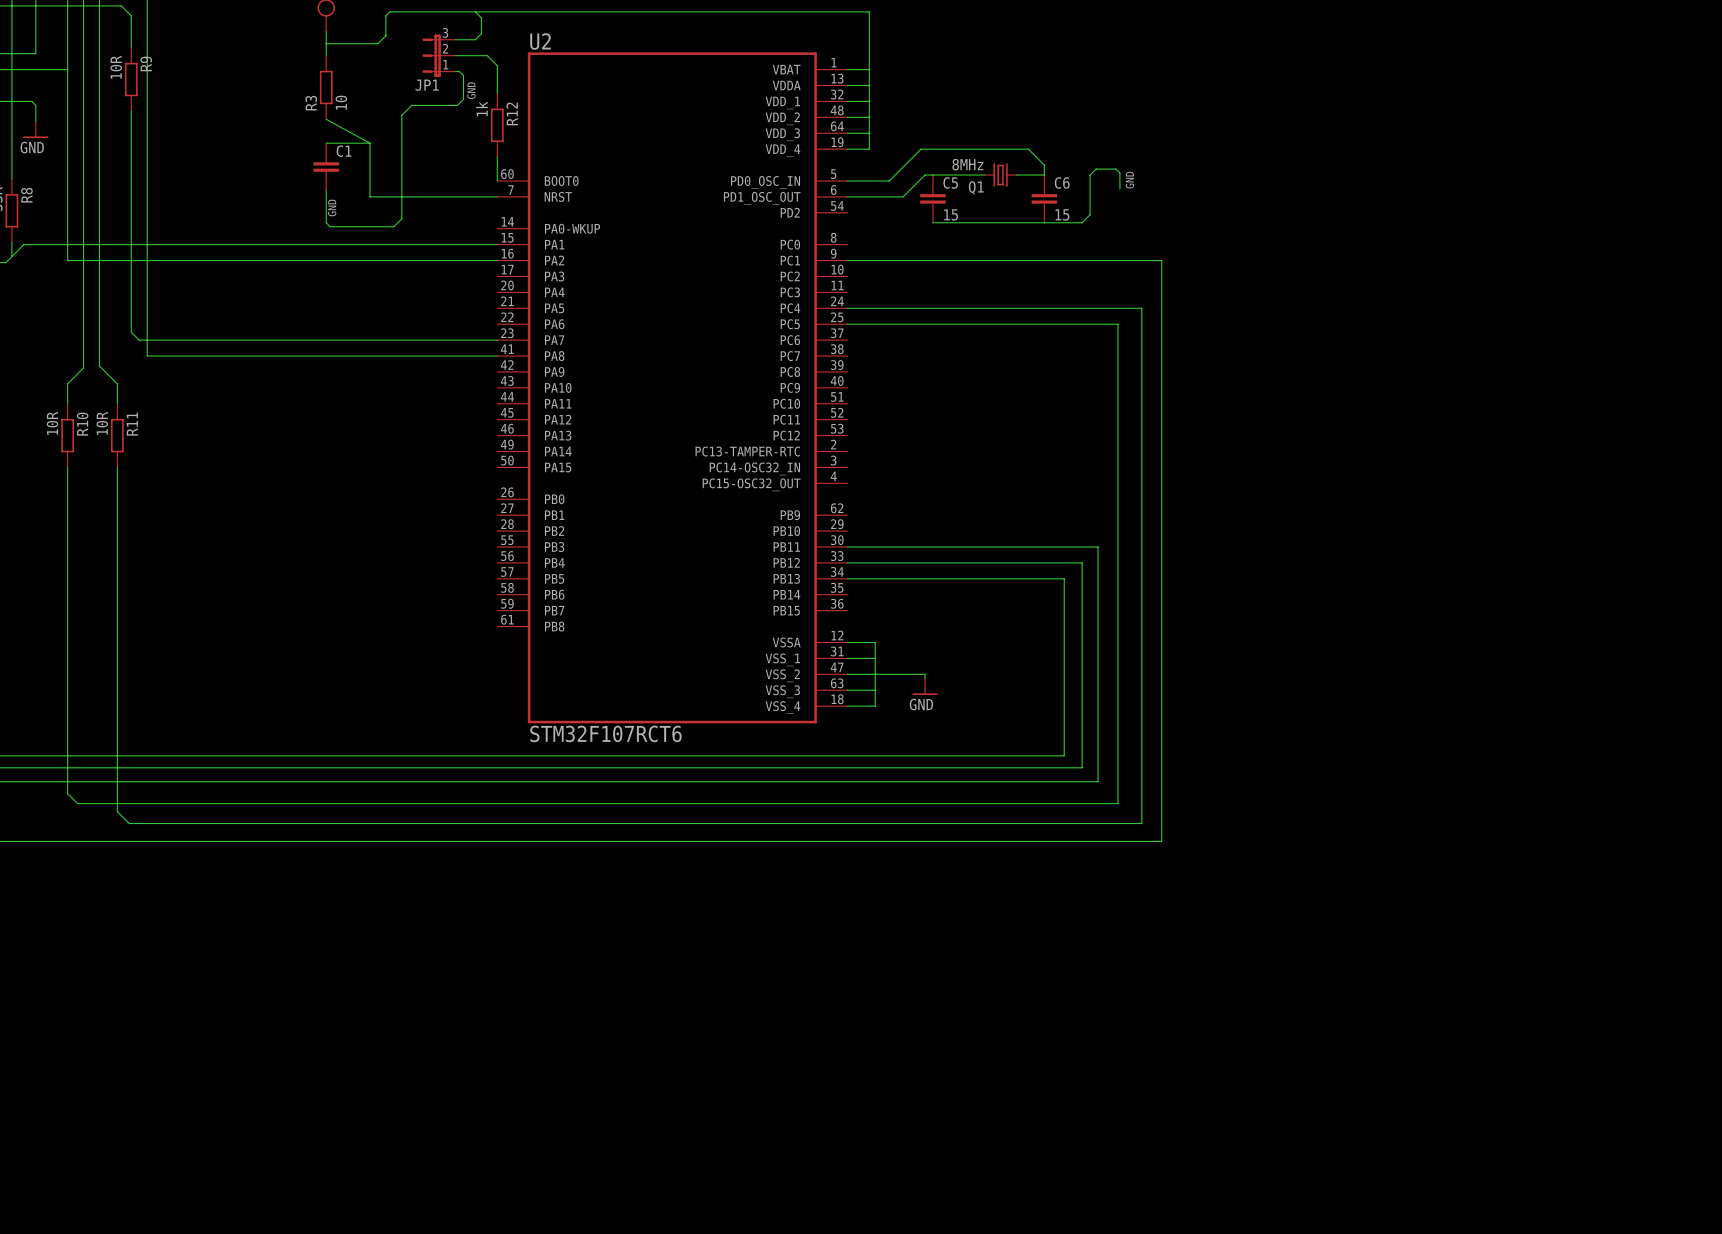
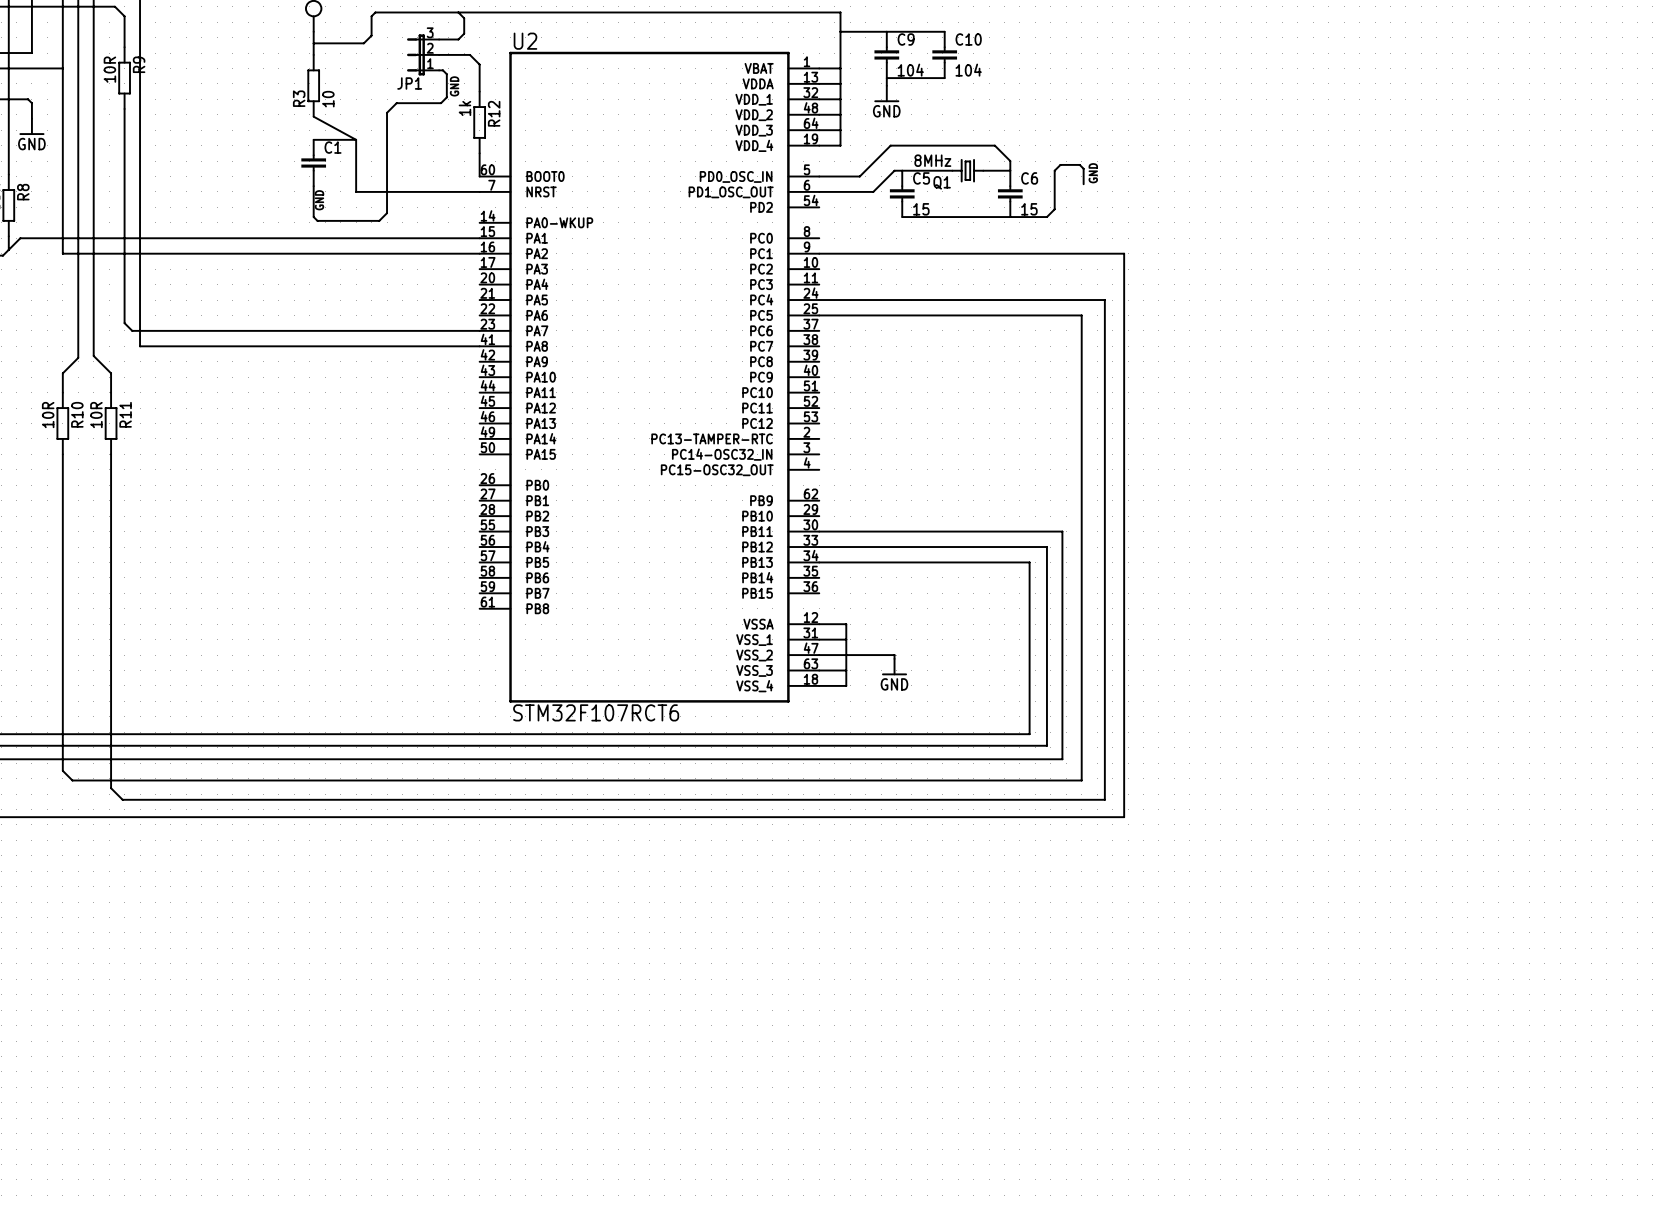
wire: none -> (840, 31) (944, 31)
C9: none -> 104 (886, 54)
C10: none -> 104 (944, 54)
wire: none -> (944, 78) (886, 78) (886, 85)
power symbol: none -> GND (886, 93)

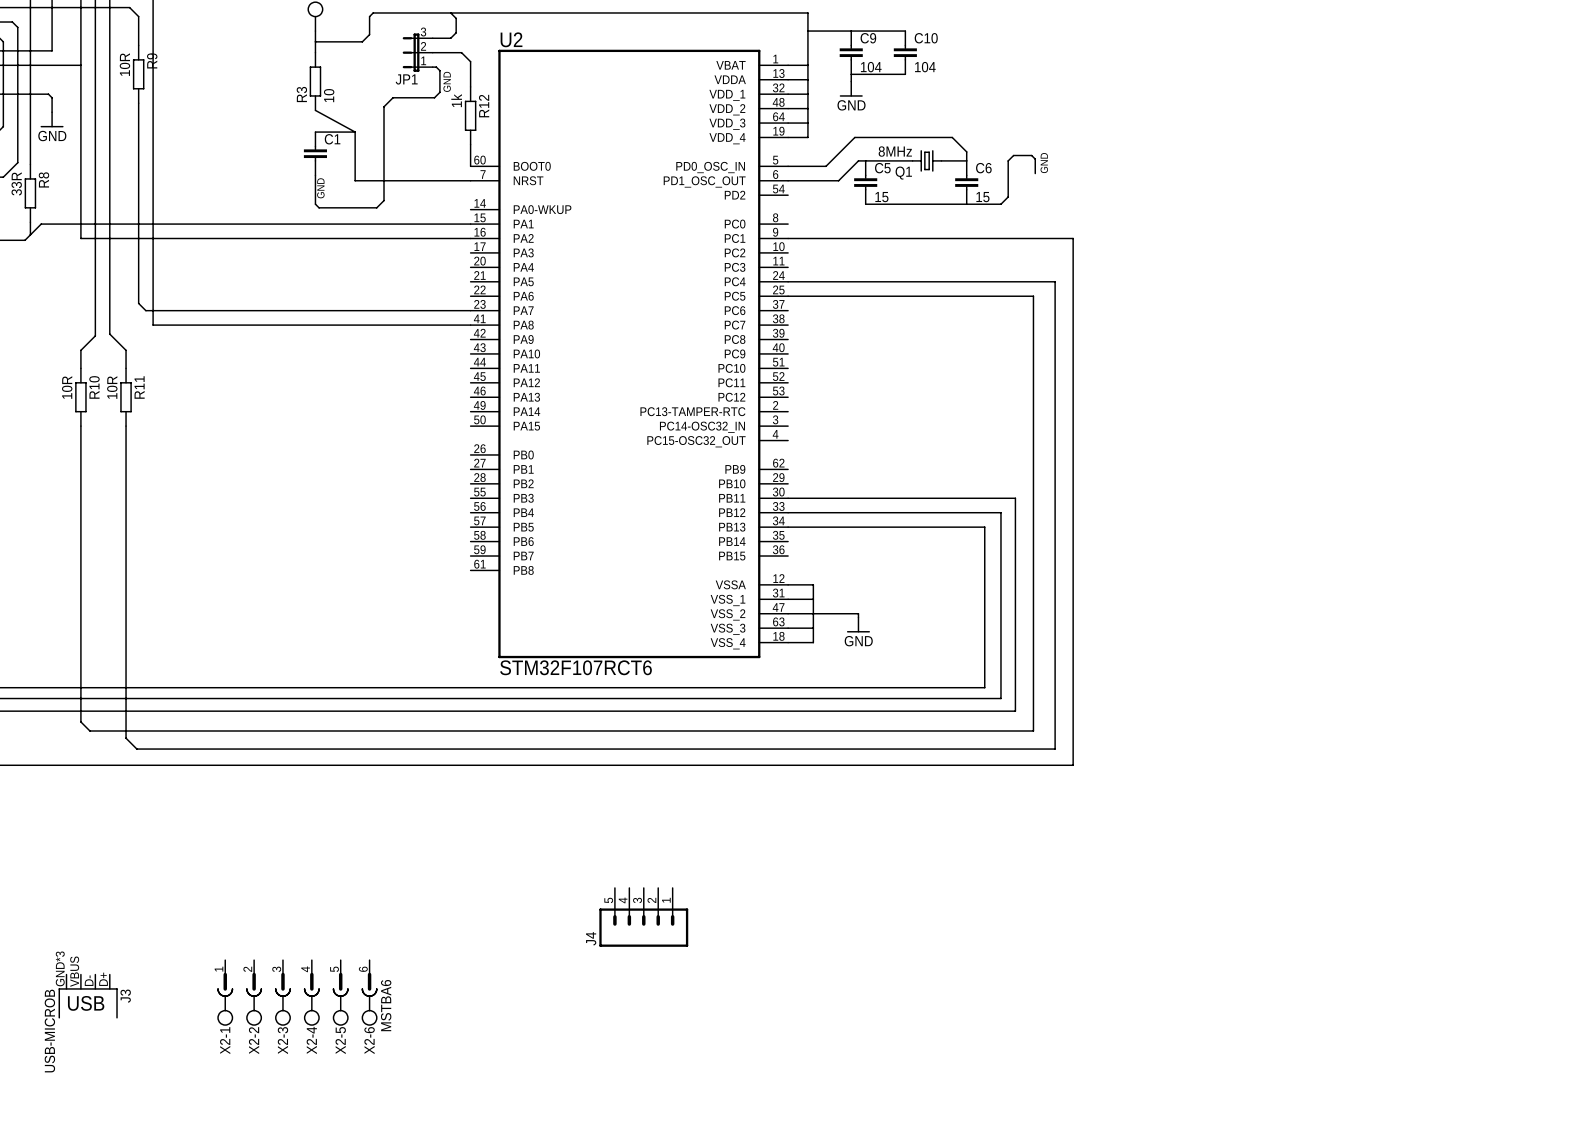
J4: none -> (643, 917)
X2-1: none -> (225, 992)
X2-2: none -> (254, 992)
X2-3: none -> (282, 992)
X2-4: none -> (311, 992)
X2-5: none -> (340, 992)
X2-6: none -> MSTBA6 (369, 992)
J3: none -> USB-MICROB (88, 996)

